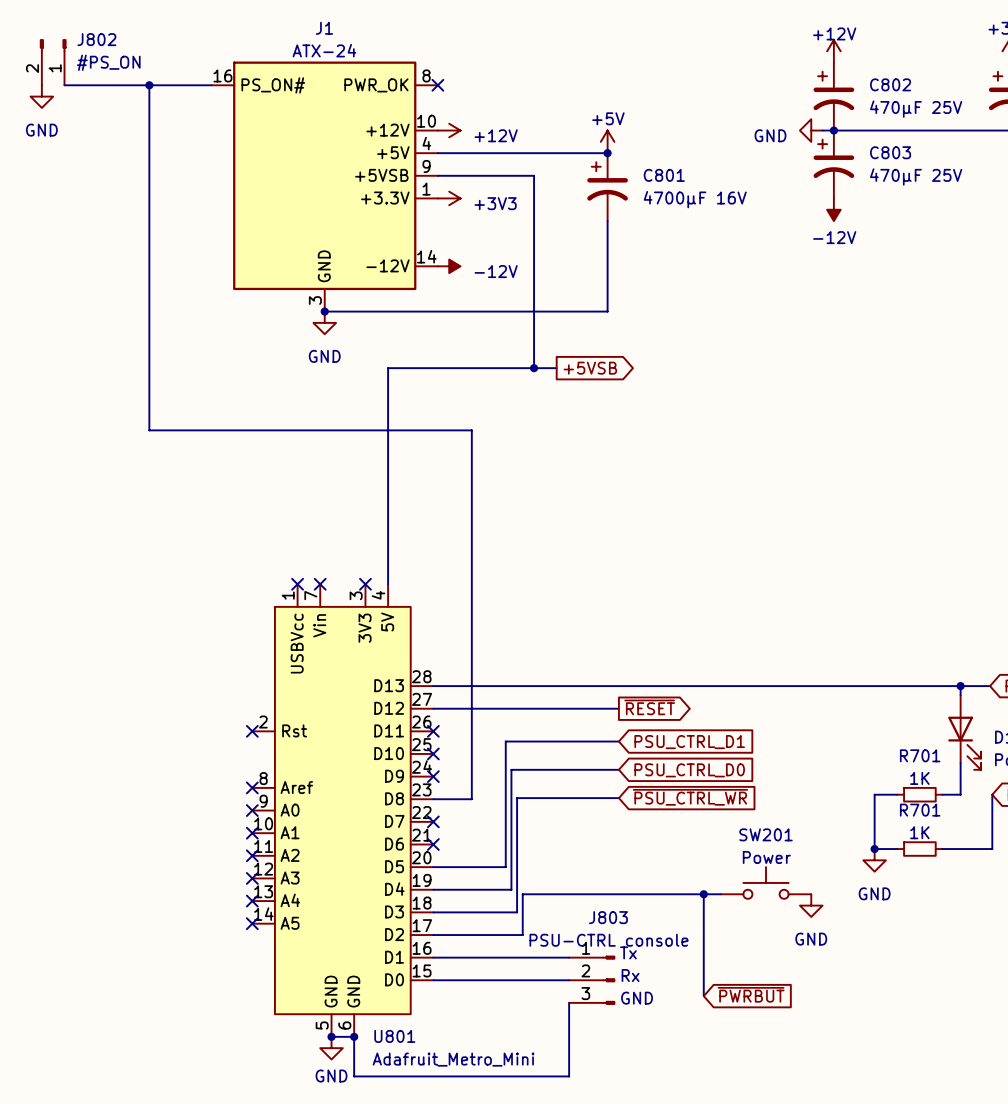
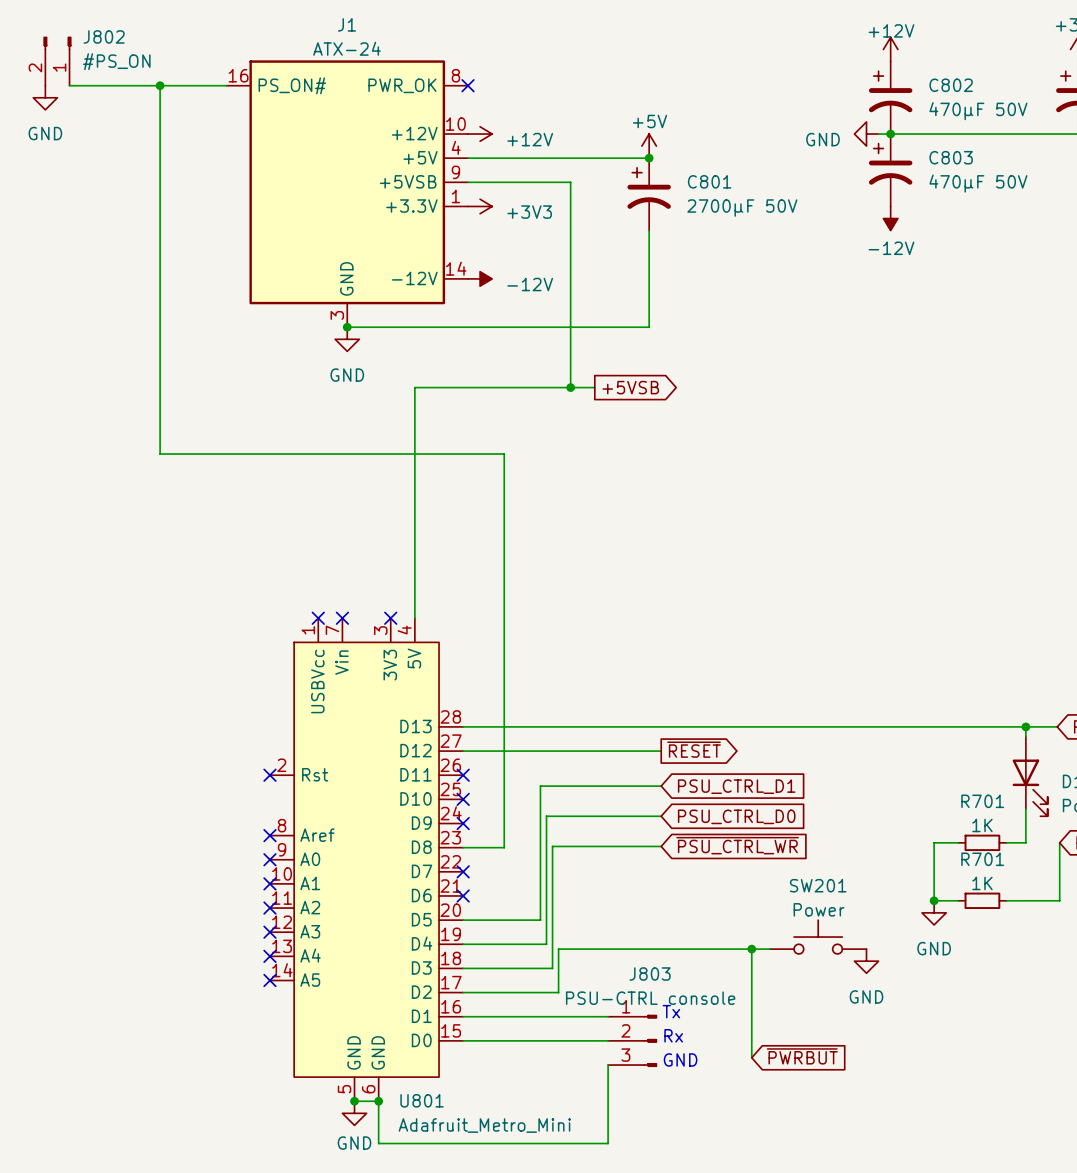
C802 value: 470µF 25V (916, 109) -> 470µF 50V (978, 111)
C803 value: 470µF 25V (916, 176) -> 470µF 50V (978, 183)
C801 value: 4700µF 16V (695, 199) -> 2700µF 50V (742, 208)

